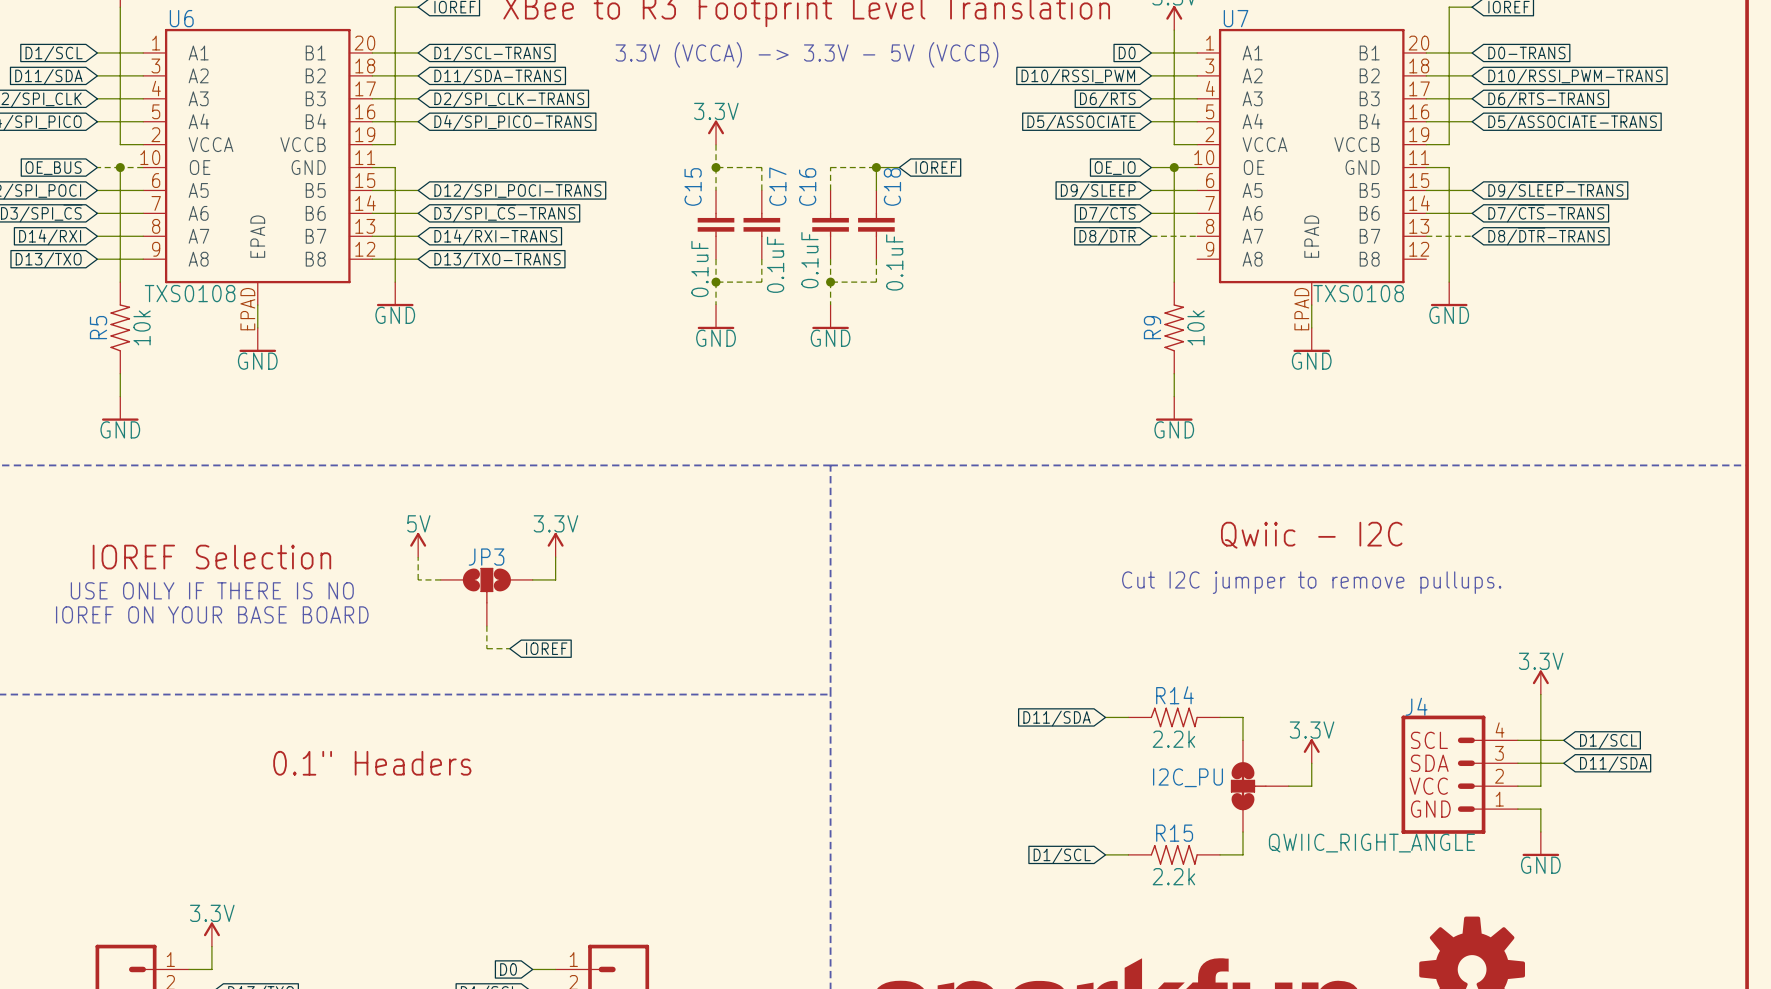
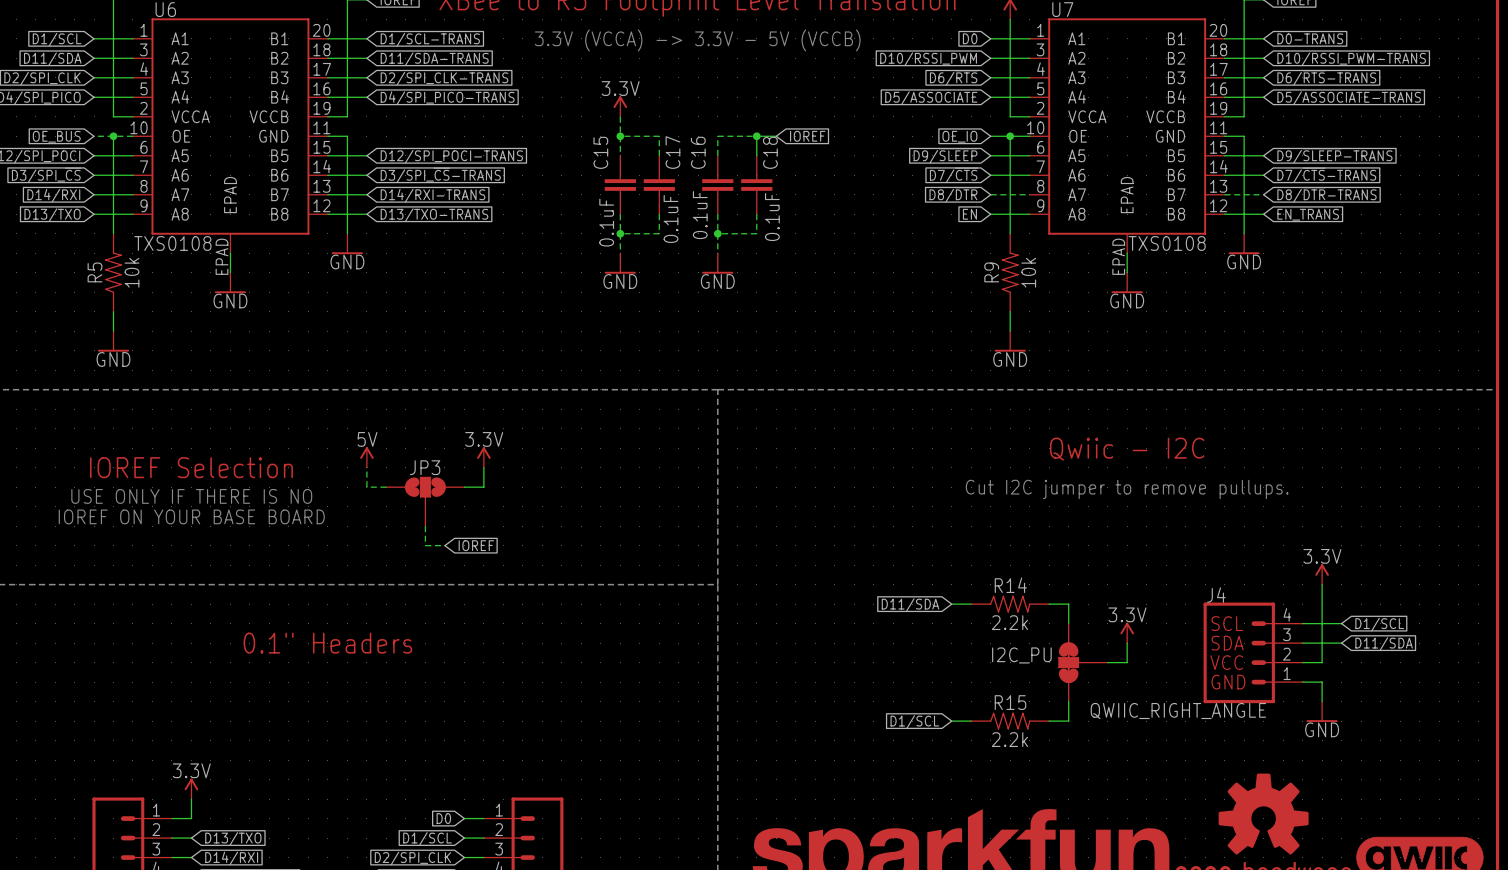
global label: none -> EN (969, 214)
wire: none -> (990, 214) (1029, 214)
wire: none -> (1224, 214) (1263, 214)
global label: none -> EN_TRANS (1308, 214)

